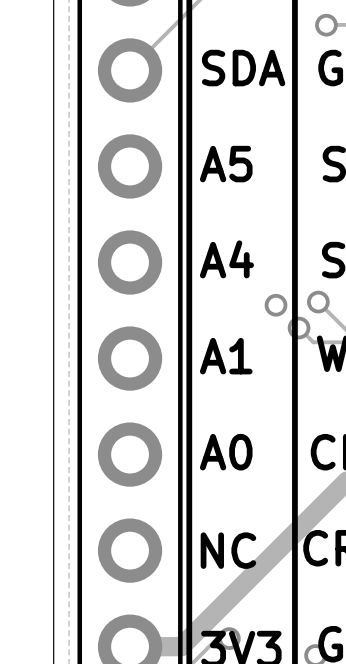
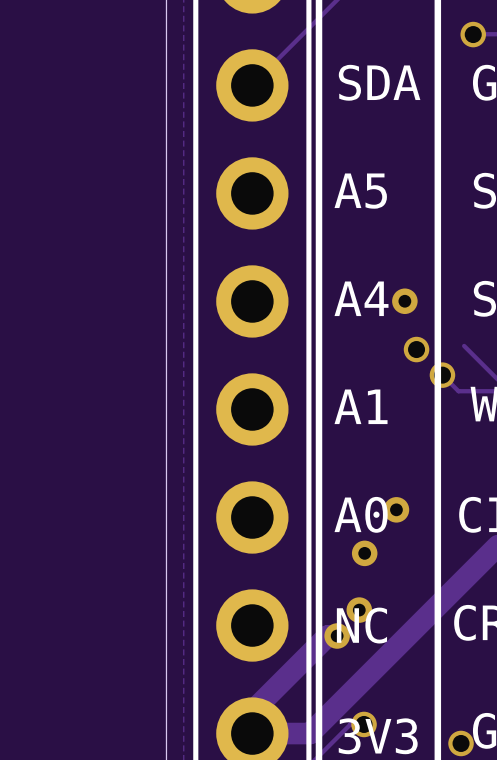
via: none -> (404, 301)
via: (318, 302) -> none
via: none -> (396, 509)
via: none -> (364, 553)
via: none -> (359, 610)
track: none -> (337, 636) (327, 636) (252, 711) (252, 714)
via: none -> (337, 636)

